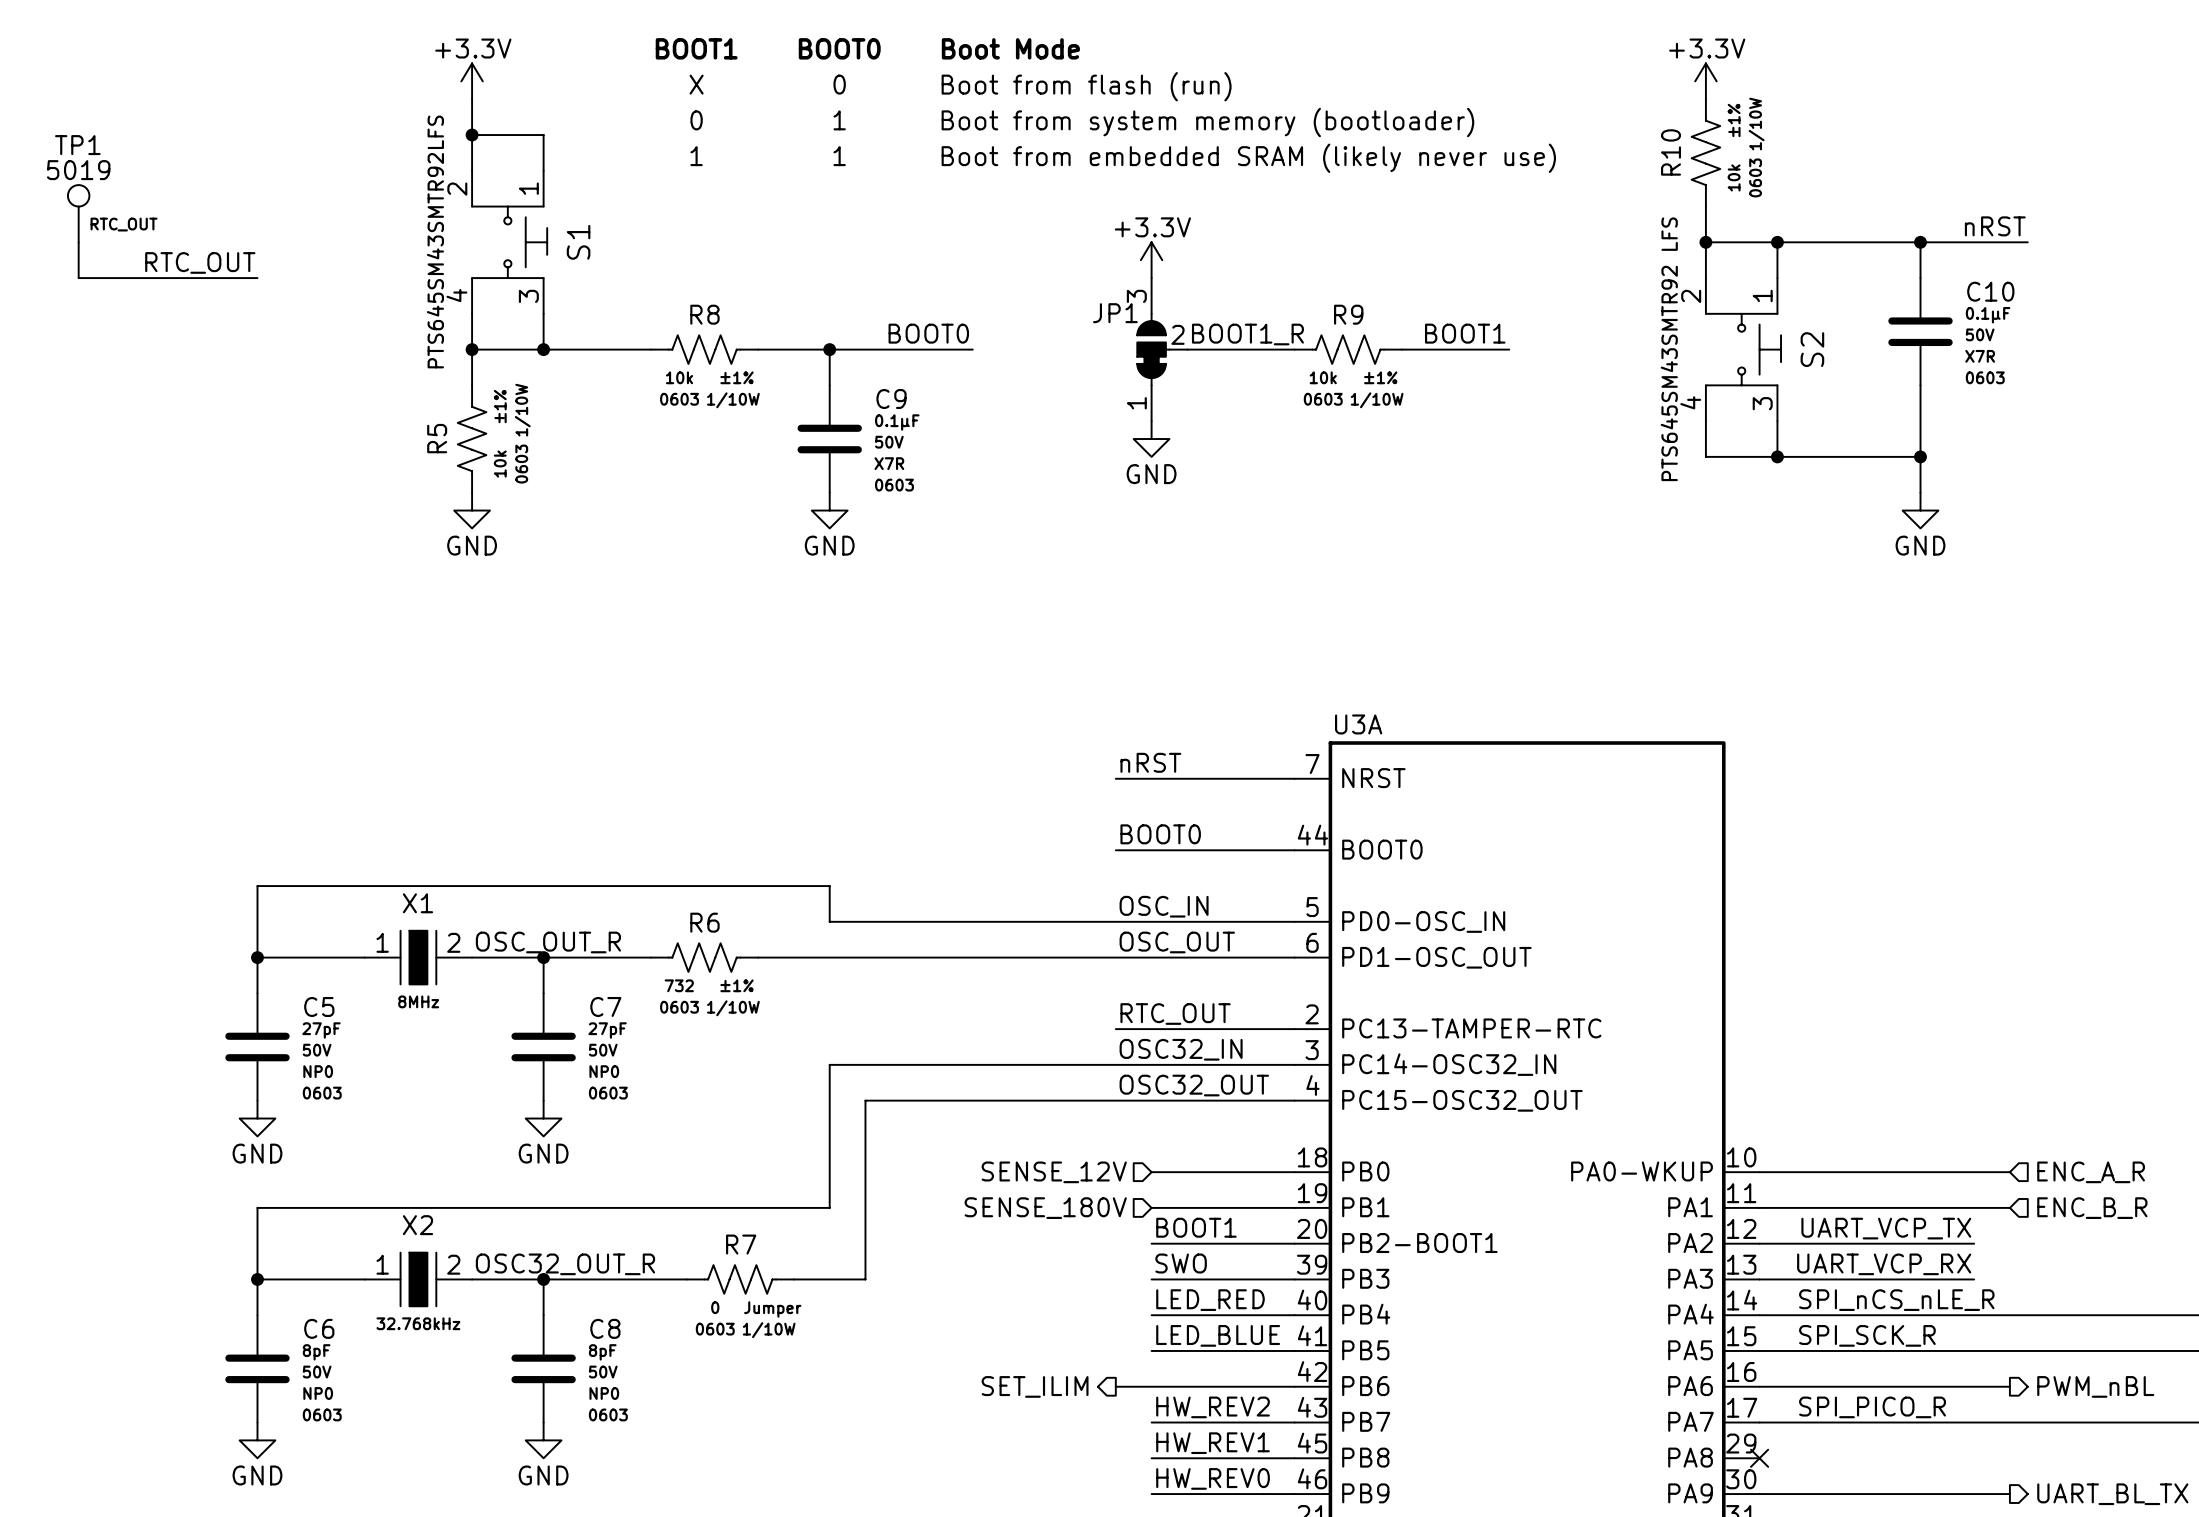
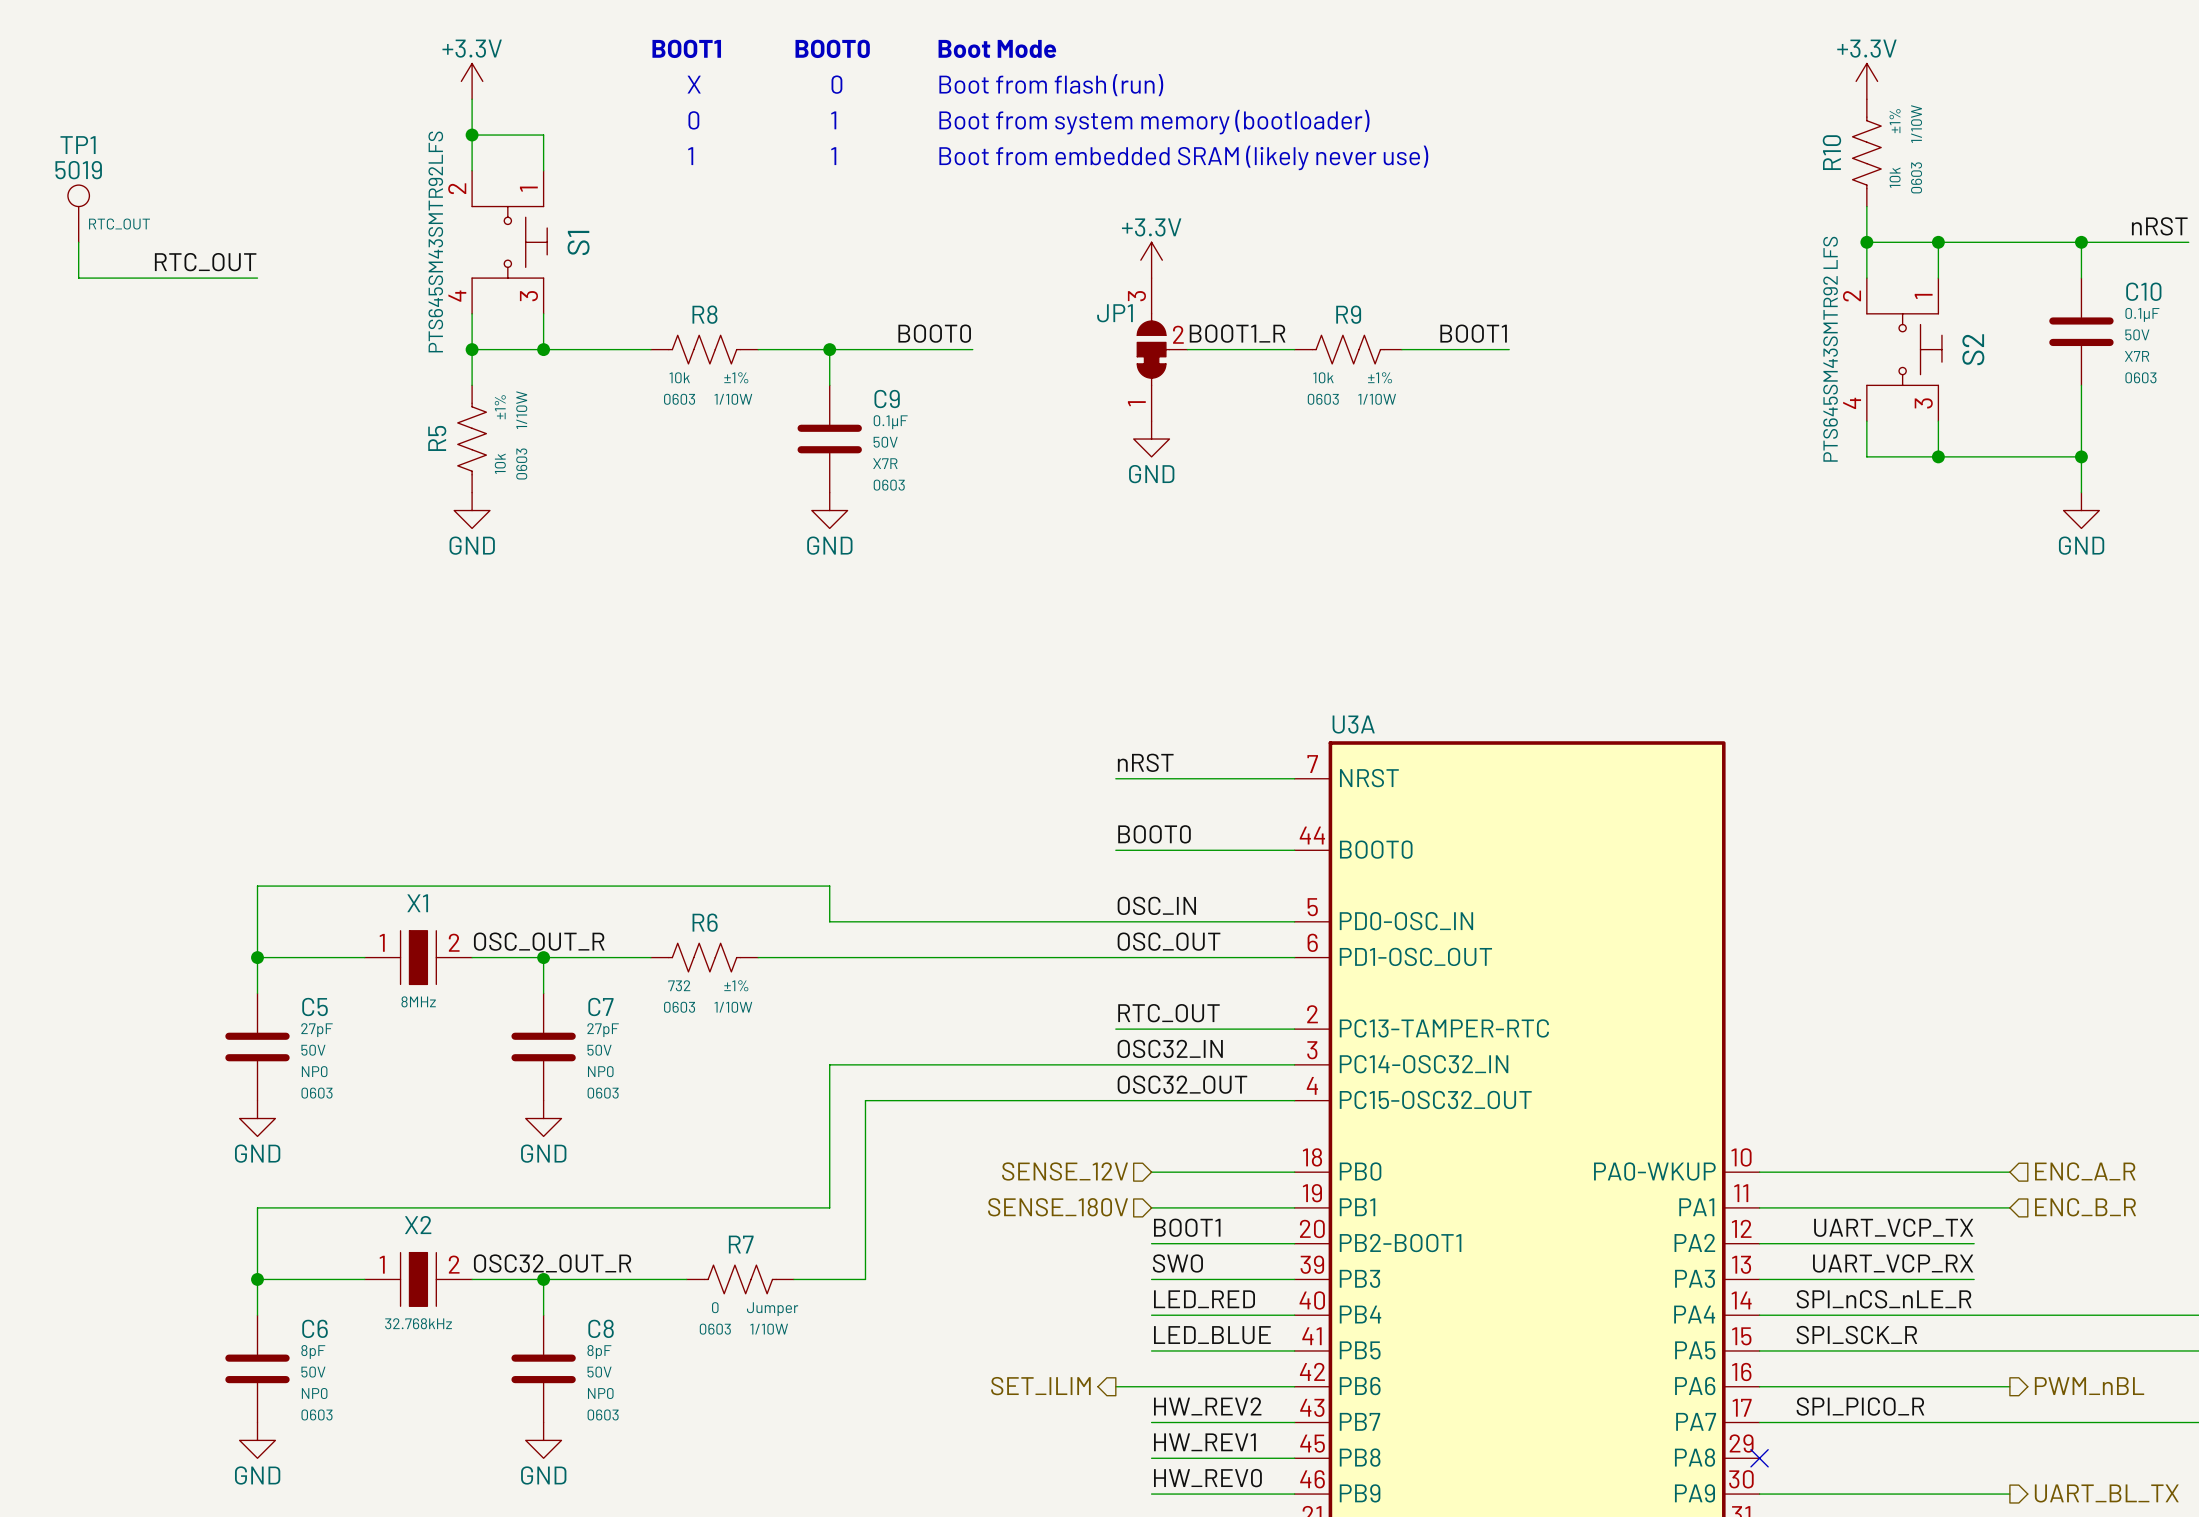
power symbol position: +3.3V (1705, 81) -> +3.3V (1866, 81)
R10 position: (1705, 152) -> (1866, 152)
wire: (1705, 206) (1705, 278) -> (1866, 206) (1866, 278)
label position: nRST (1995, 226) -> nRST (2159, 226)
wire: (1705, 242) (1866, 242) -> (1920, 456) (2081, 456)
junction: (1705, 242) -> none
wire: (1777, 242) (1777, 278) -> (1938, 242) (1938, 278)
junction: (1777, 242) -> none
junction: none -> (1866, 242)
wire: (1920, 242) (1920, 278) -> (2081, 242) (2081, 278)
junction position: (1920, 242) -> (1938, 242)
wire: none -> (2027, 242) (2188, 242)
junction: none -> (2081, 242)
C10 position: (1920, 331) -> (2081, 331)
S2 position: (1743, 349) -> (1904, 349)
wire: (1920, 385) (1920, 492) -> (2081, 385) (2081, 492)
wire: (1705, 421) (1705, 456) (1866, 456) -> (1866, 421) (1866, 456)
wire: (1777, 421) (1777, 456) -> (1938, 421) (1938, 456)
junction: (1777, 456) -> none
junction position: (1920, 456) -> (1938, 456)
junction: none -> (2081, 456)
power symbol position: GND (1920, 510) -> GND (2081, 510)

